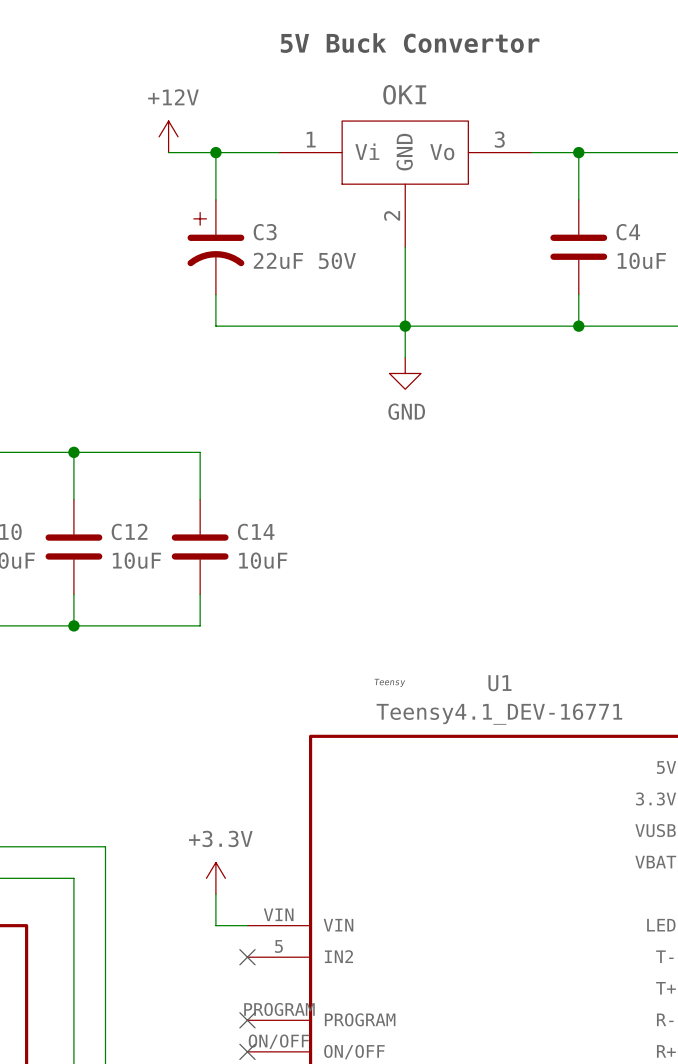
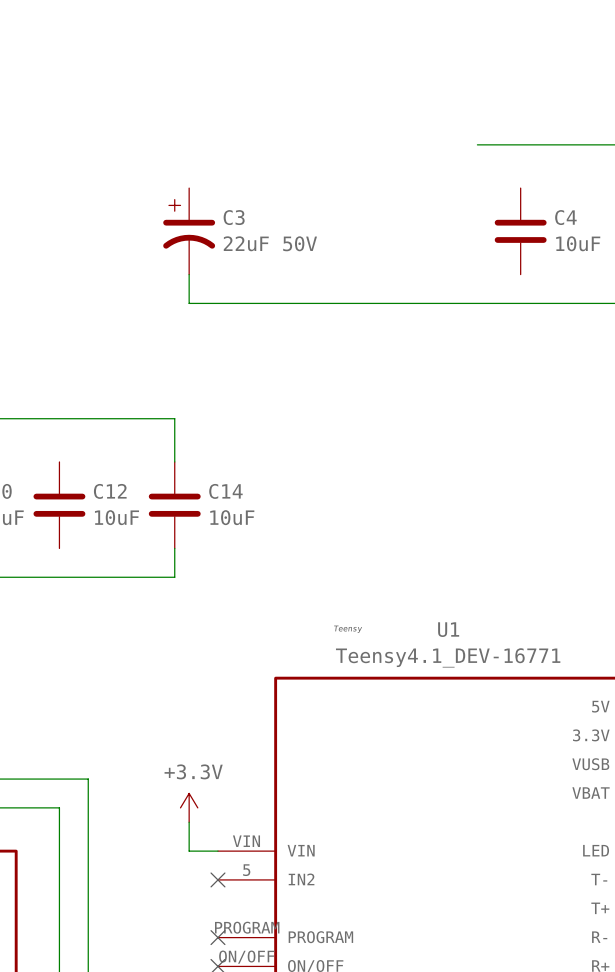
text: 5V Buck Convertor (410, 43) -> none
power symbol: +12V (168, 136) -> none
wire: (168, 152) (279, 152) -> none
wire: (215, 152) (215, 199) -> none
junction: (215, 152) -> none
wire: (578, 152) (578, 199) -> none
junction: (578, 152) -> none
part: OKI (405, 184) -> none
wire: (405, 247) (405, 357) -> none
wire: (578, 294) (578, 326) -> none
junction: (405, 326) -> none
junction: (578, 326) -> none
power symbol: GND (405, 373) -> none
wire: (73, 452) (73, 499) -> none
junction: (73, 452) -> none
wire: (73, 594) (73, 625) -> none
junction: (73, 625) -> none

